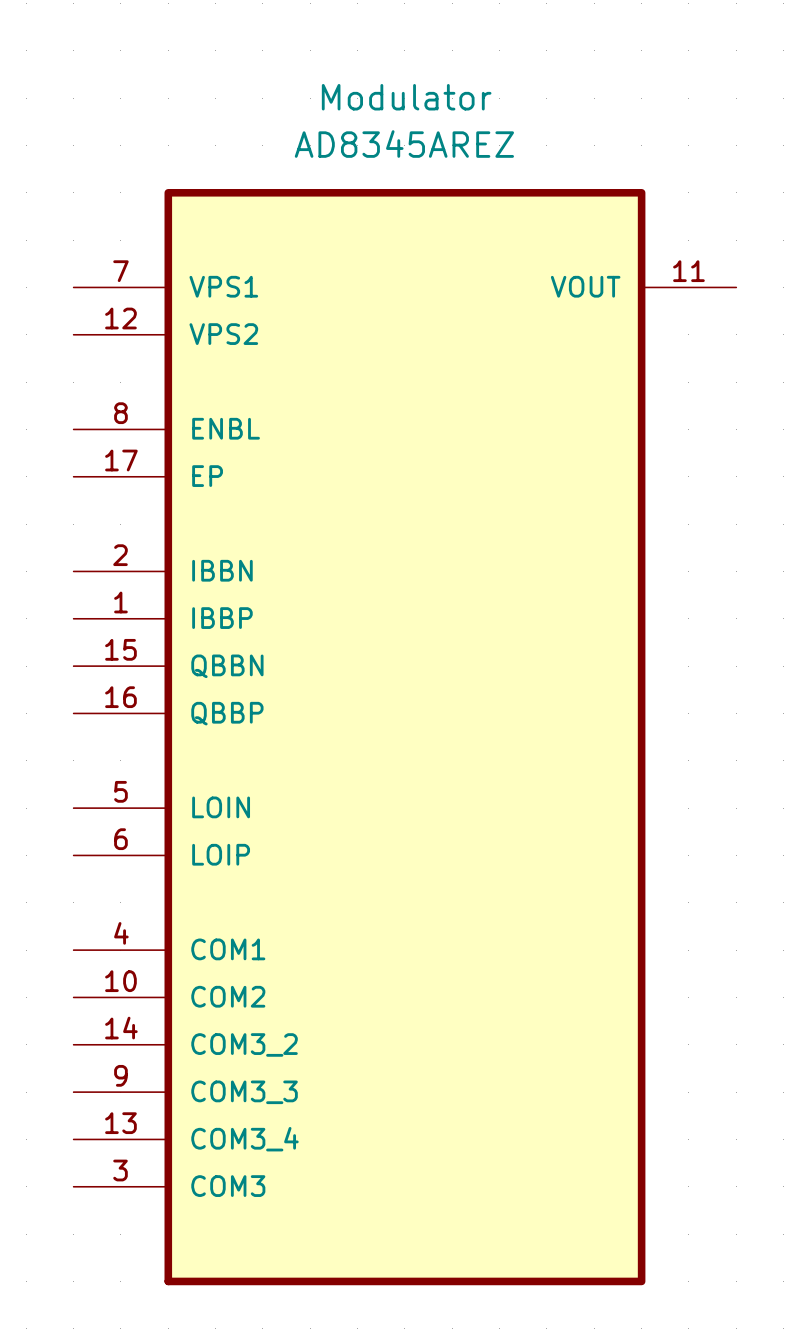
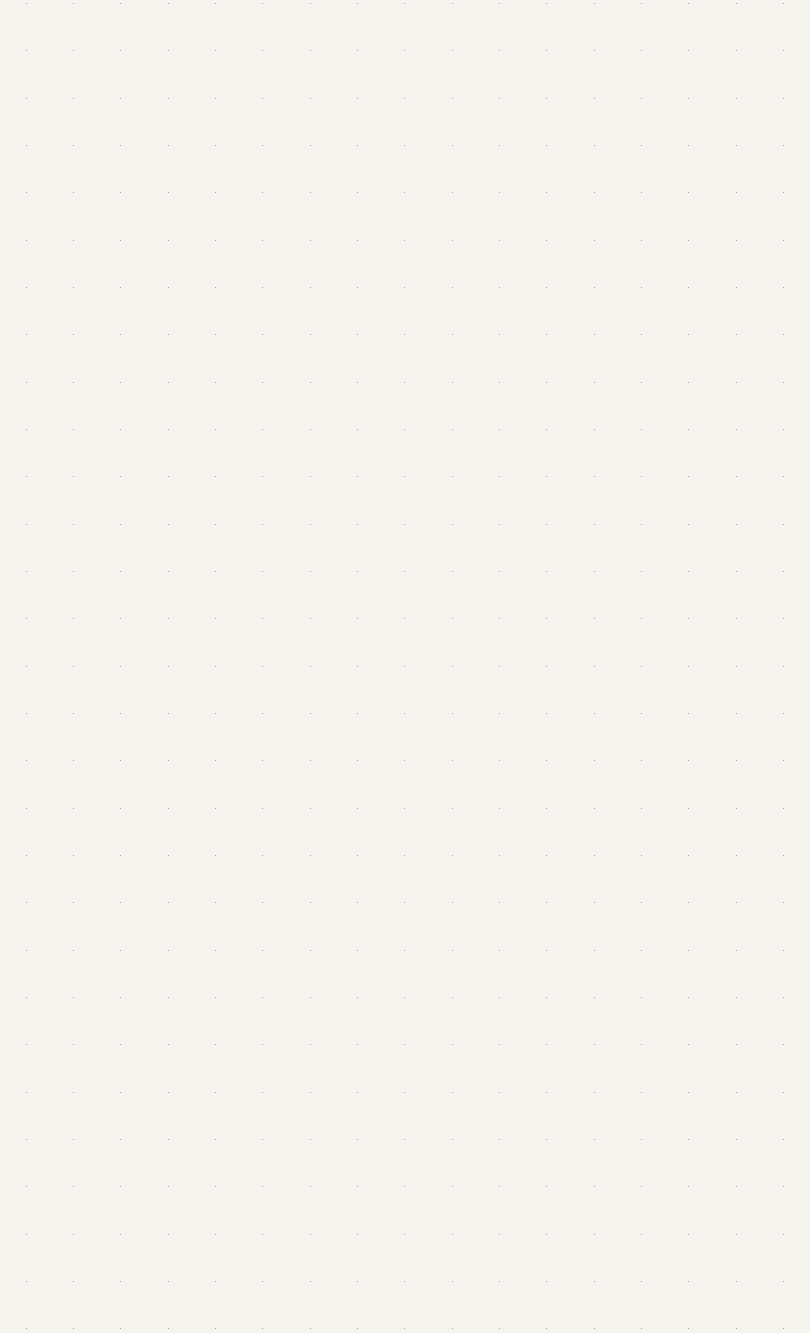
Modulator: AD8345AREZ (404, 737) -> none

